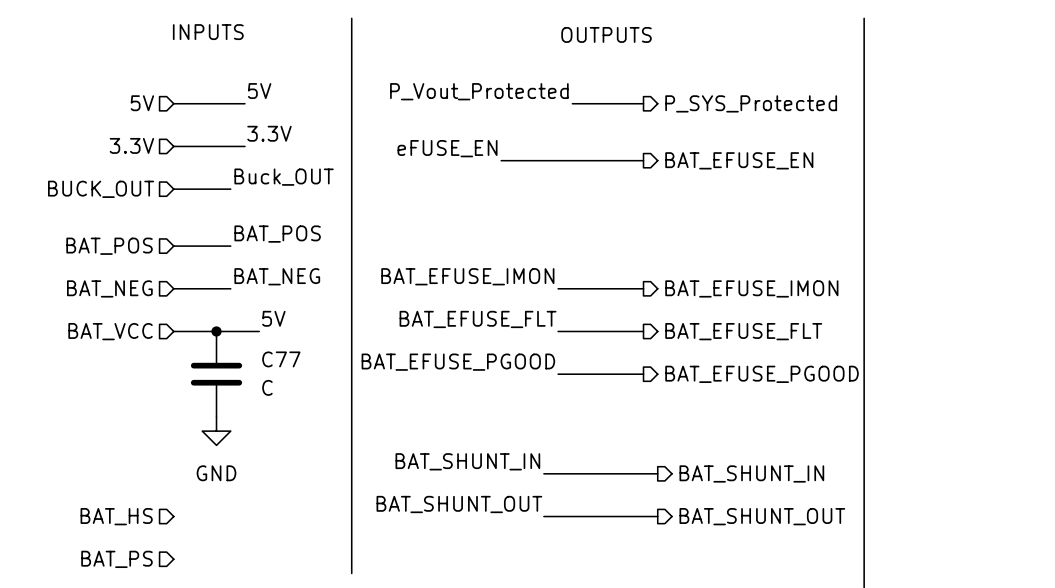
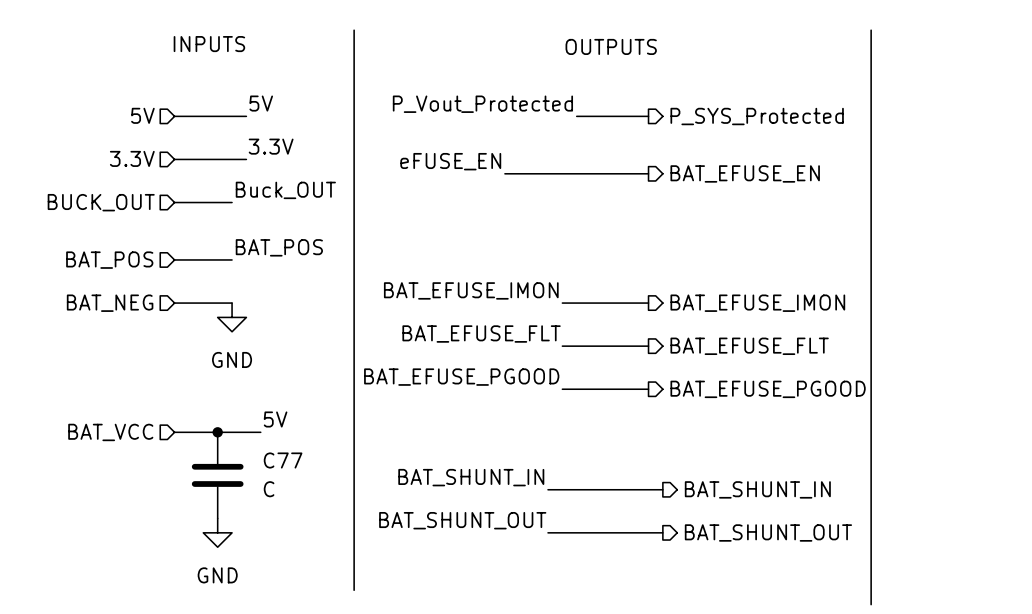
label: BAT_NEG (277, 276) -> none
power symbol: none -> GND (232, 317)
label position: 5V (273, 318) -> 5V (275, 419)
hierarchical label position: BAT_VCC (110, 331) -> BAT_VCC (110, 432)
wire: (173, 331) (259, 331) -> (174, 432) (260, 432)
junction: (216, 331) -> none
C77 position: (216, 374) -> (217, 475)
junction: none -> (217, 432)
power symbol: GND (216, 431) -> none
hierarchical label: BAT_HS (116, 516) -> none
power symbol: none -> GND (217, 532)
hierarchical label: BAT_PS (116, 559) -> none

